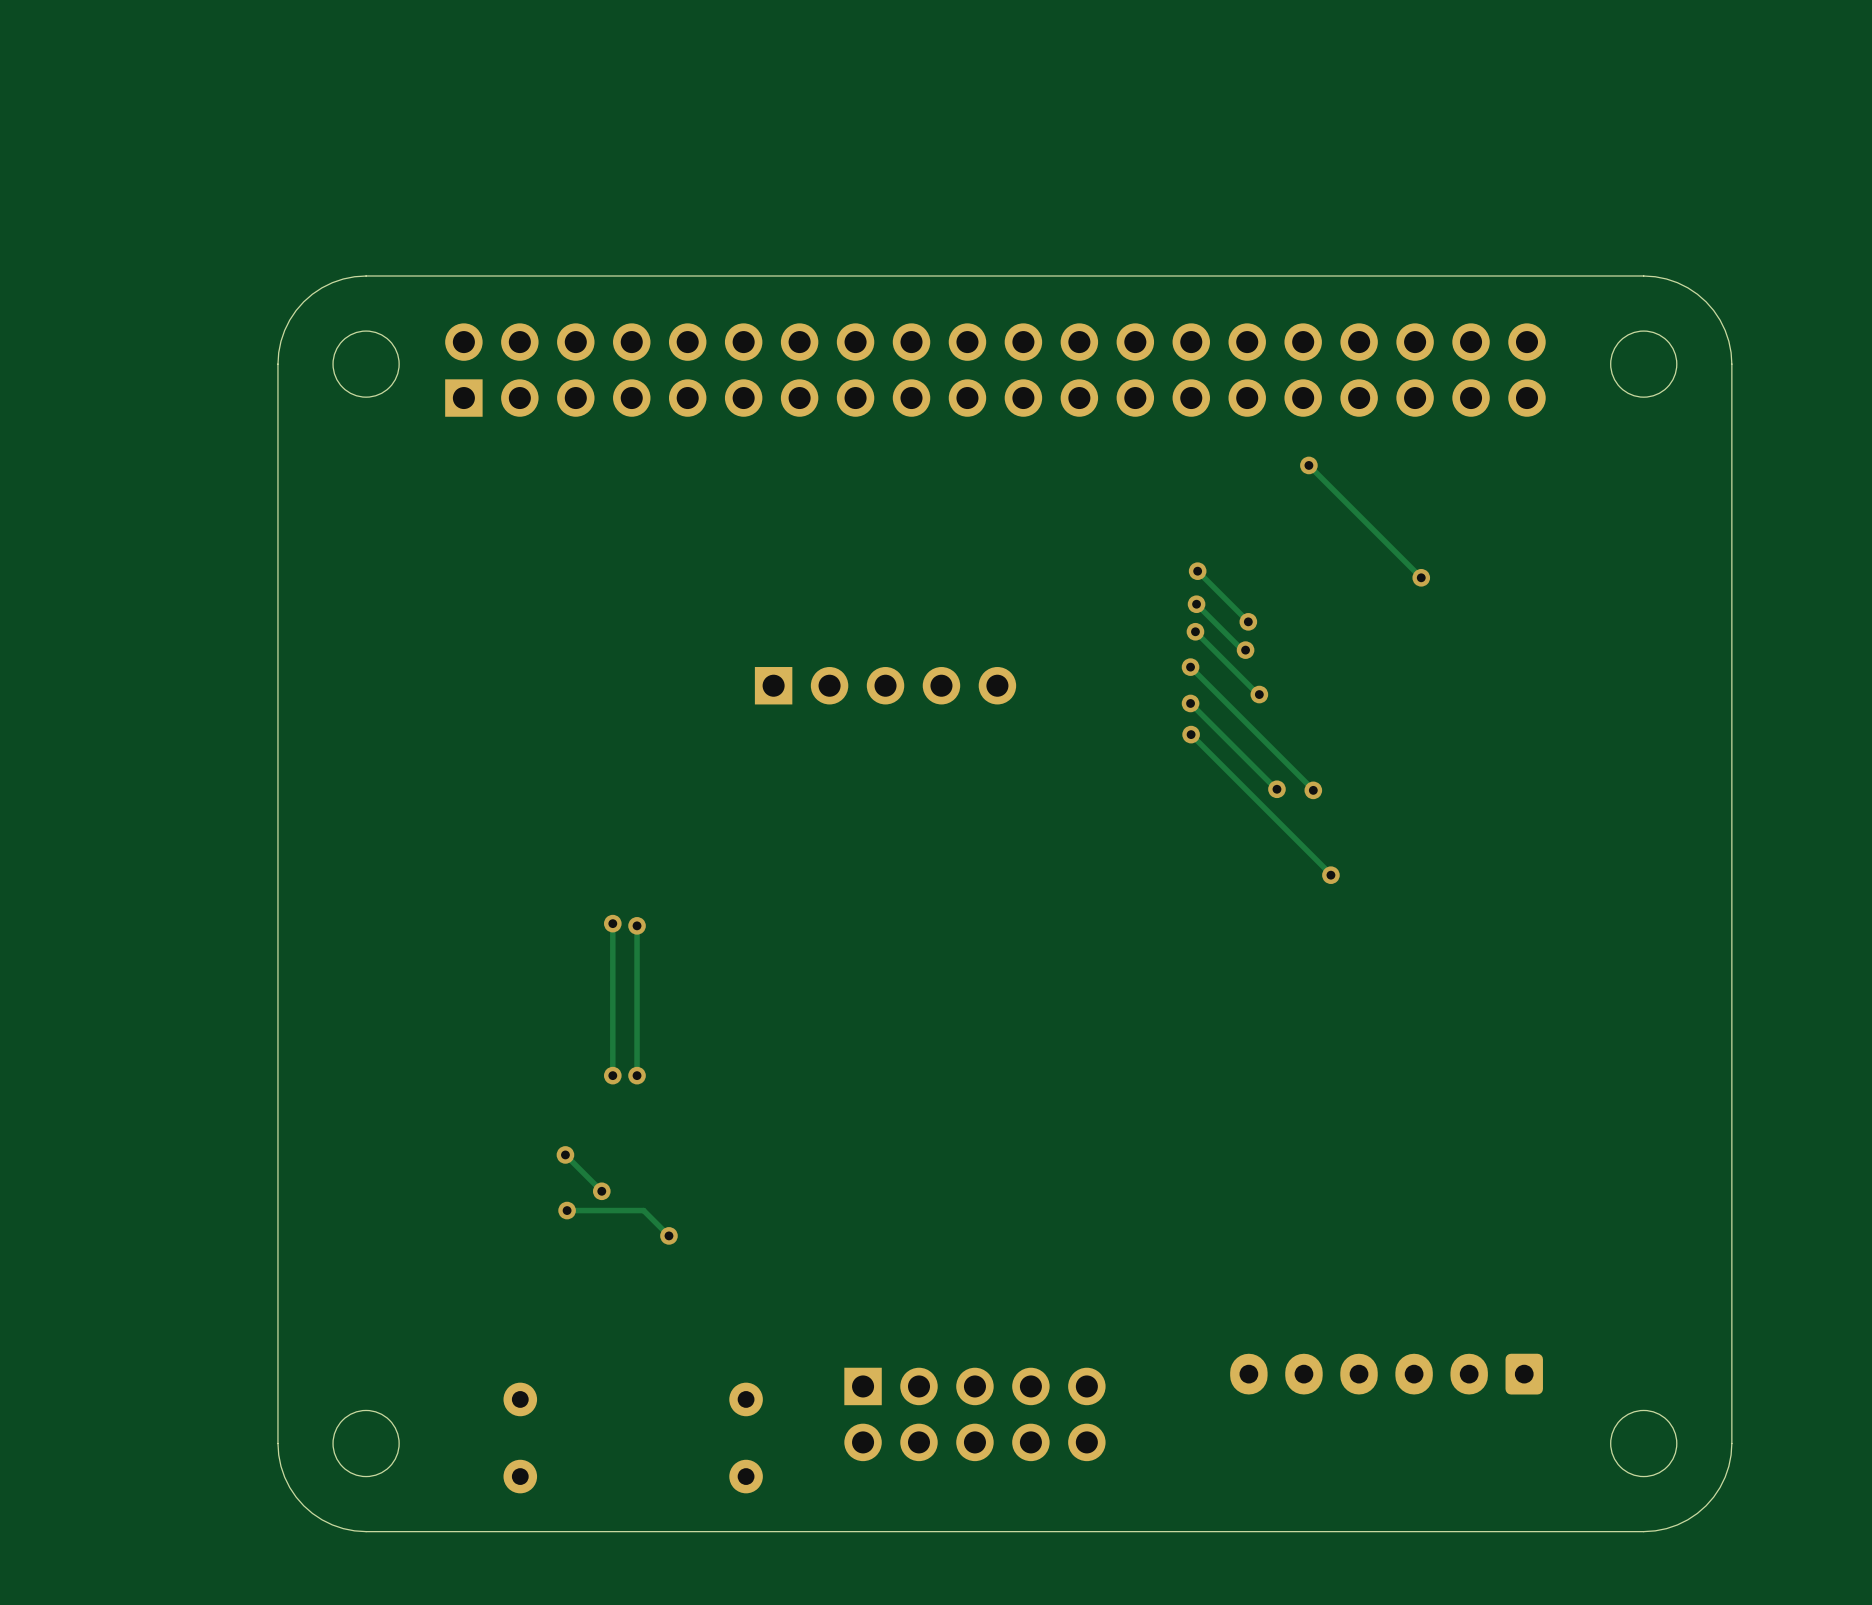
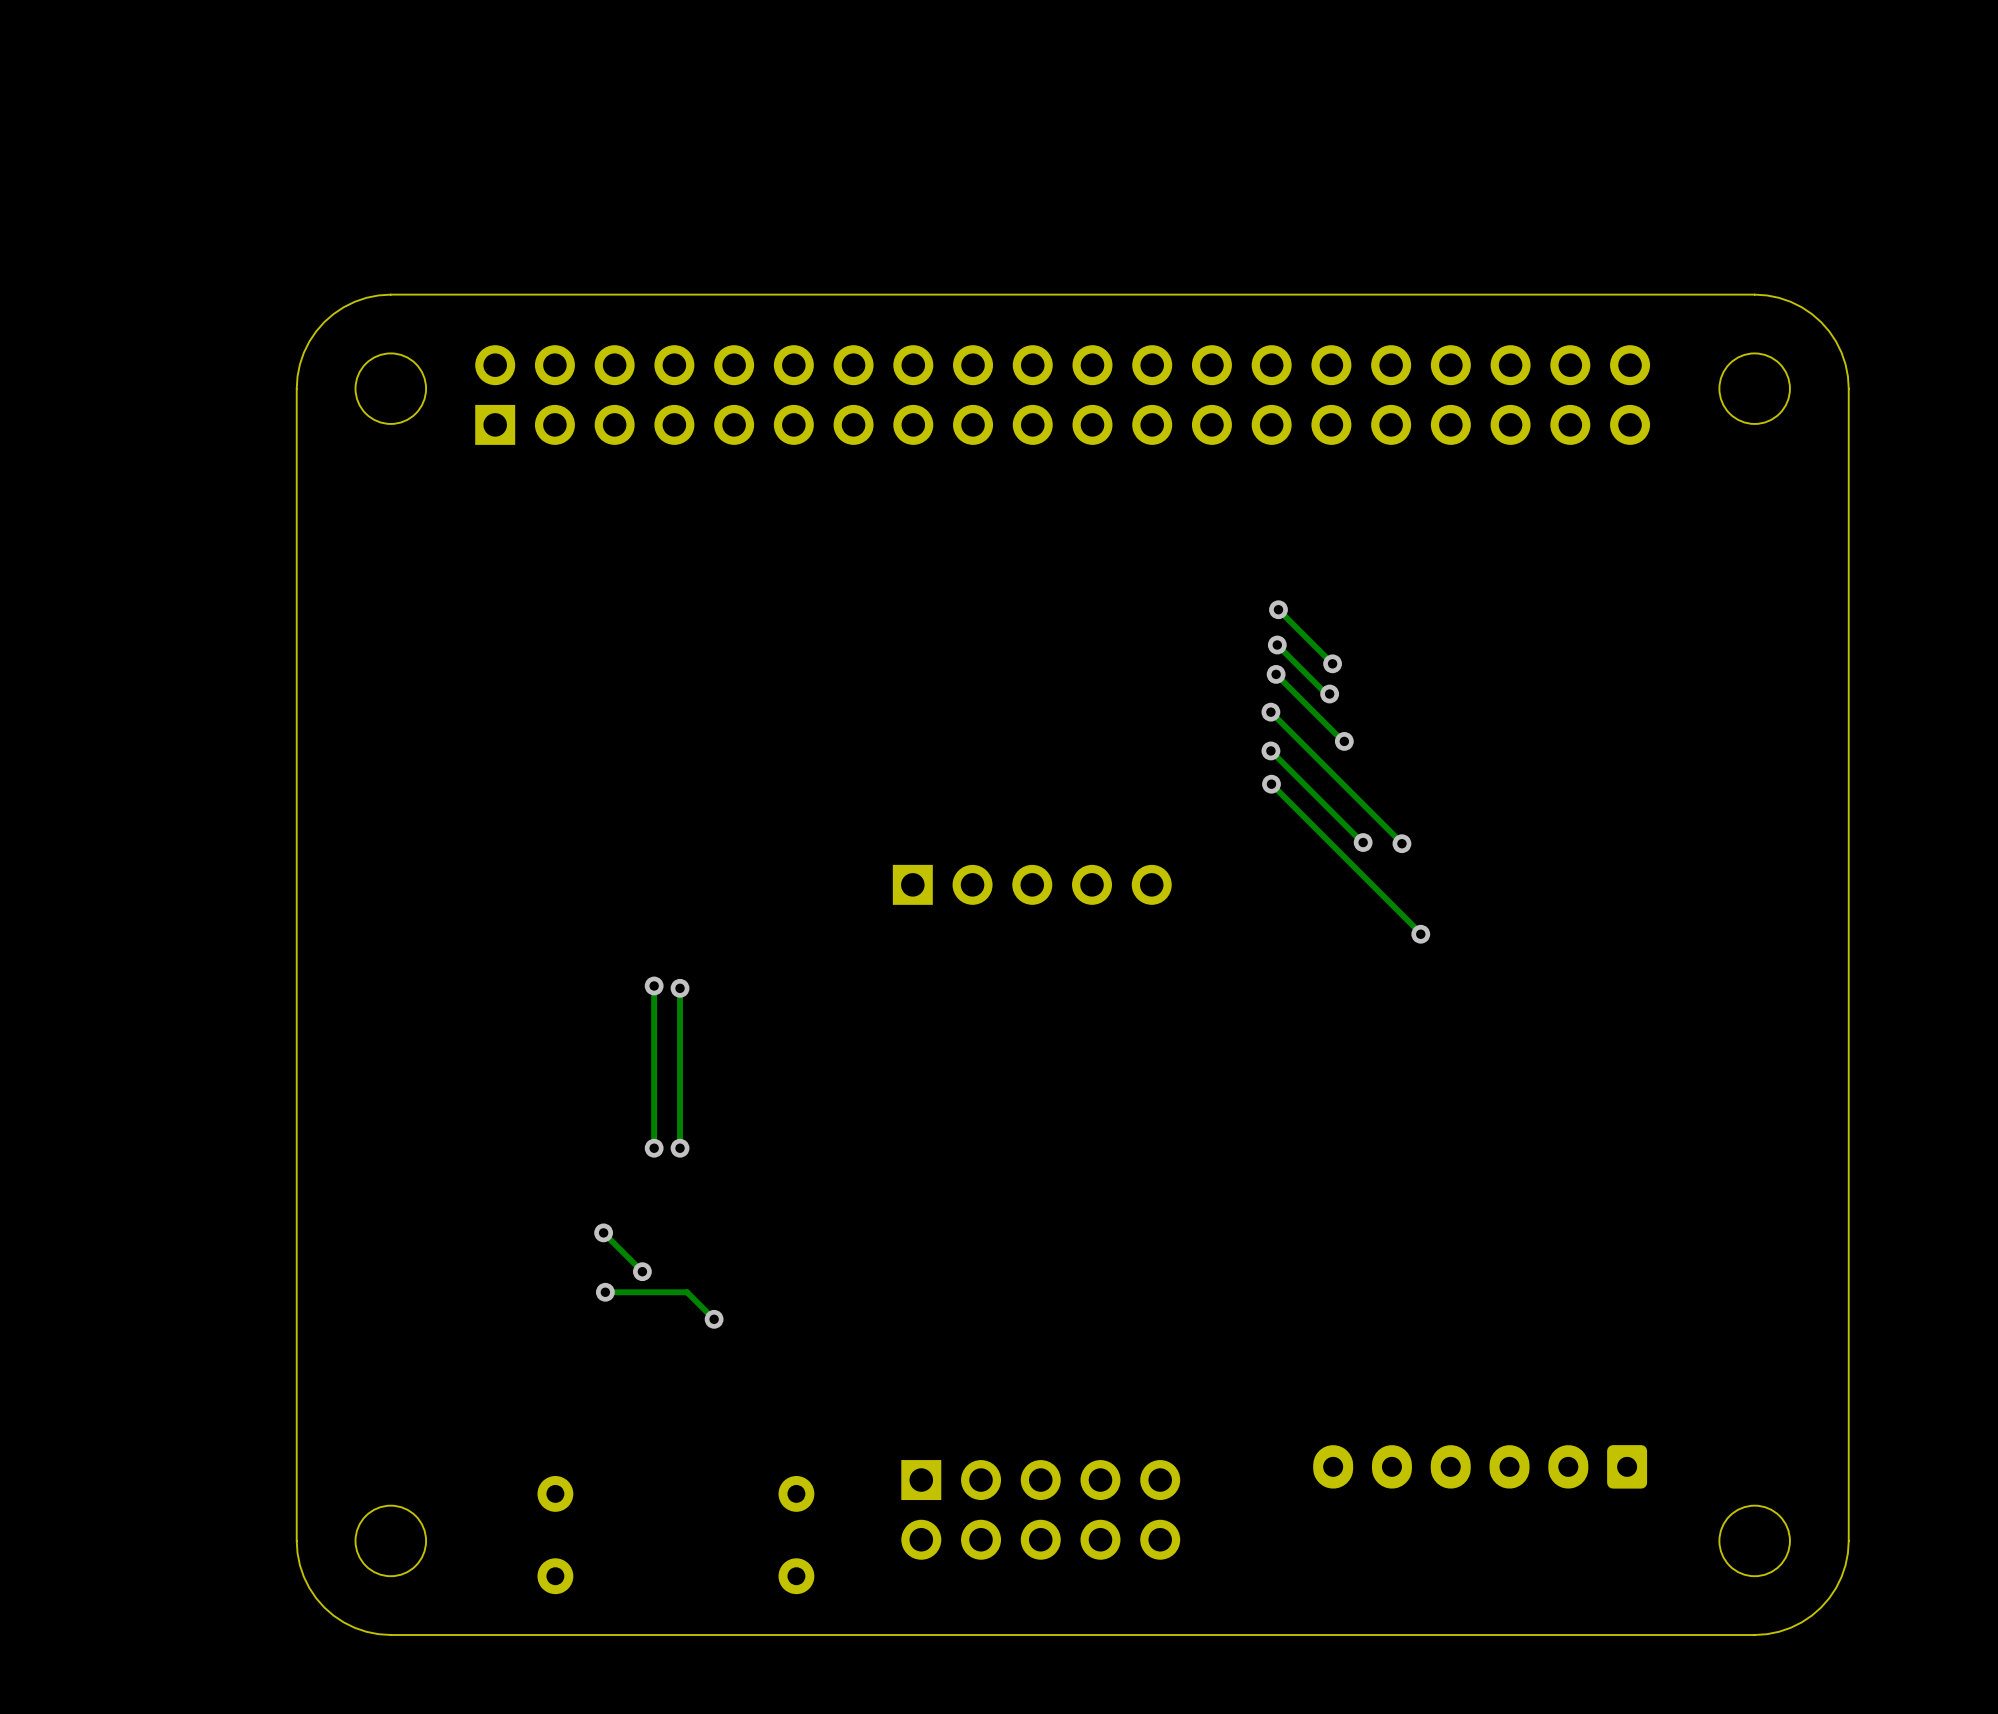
track: (1308, 465) (1421, 577) -> none
via: (1308, 465) -> none
via: (1421, 577) -> none
part position: (885, 685) -> (1032, 884)

